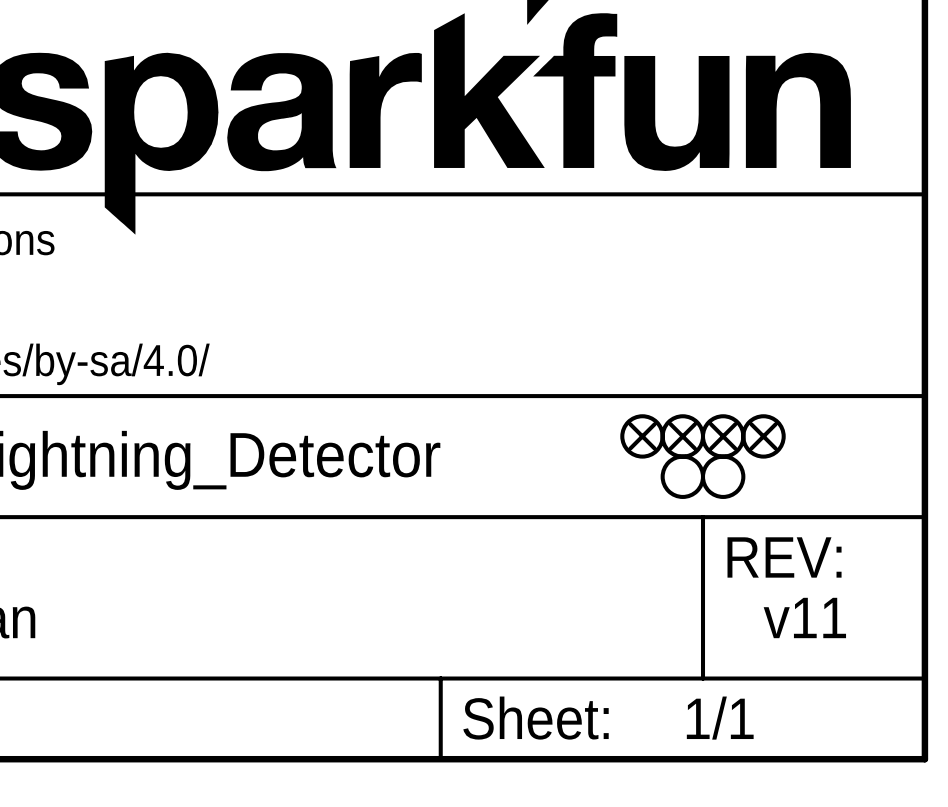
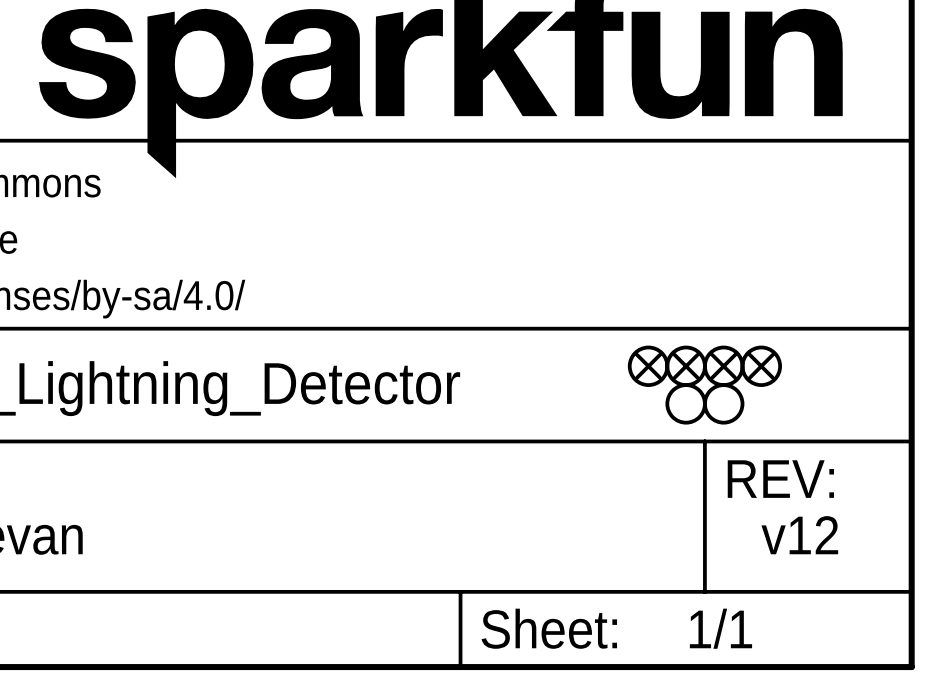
text: v11 (804, 617) -> v12 (799, 535)

